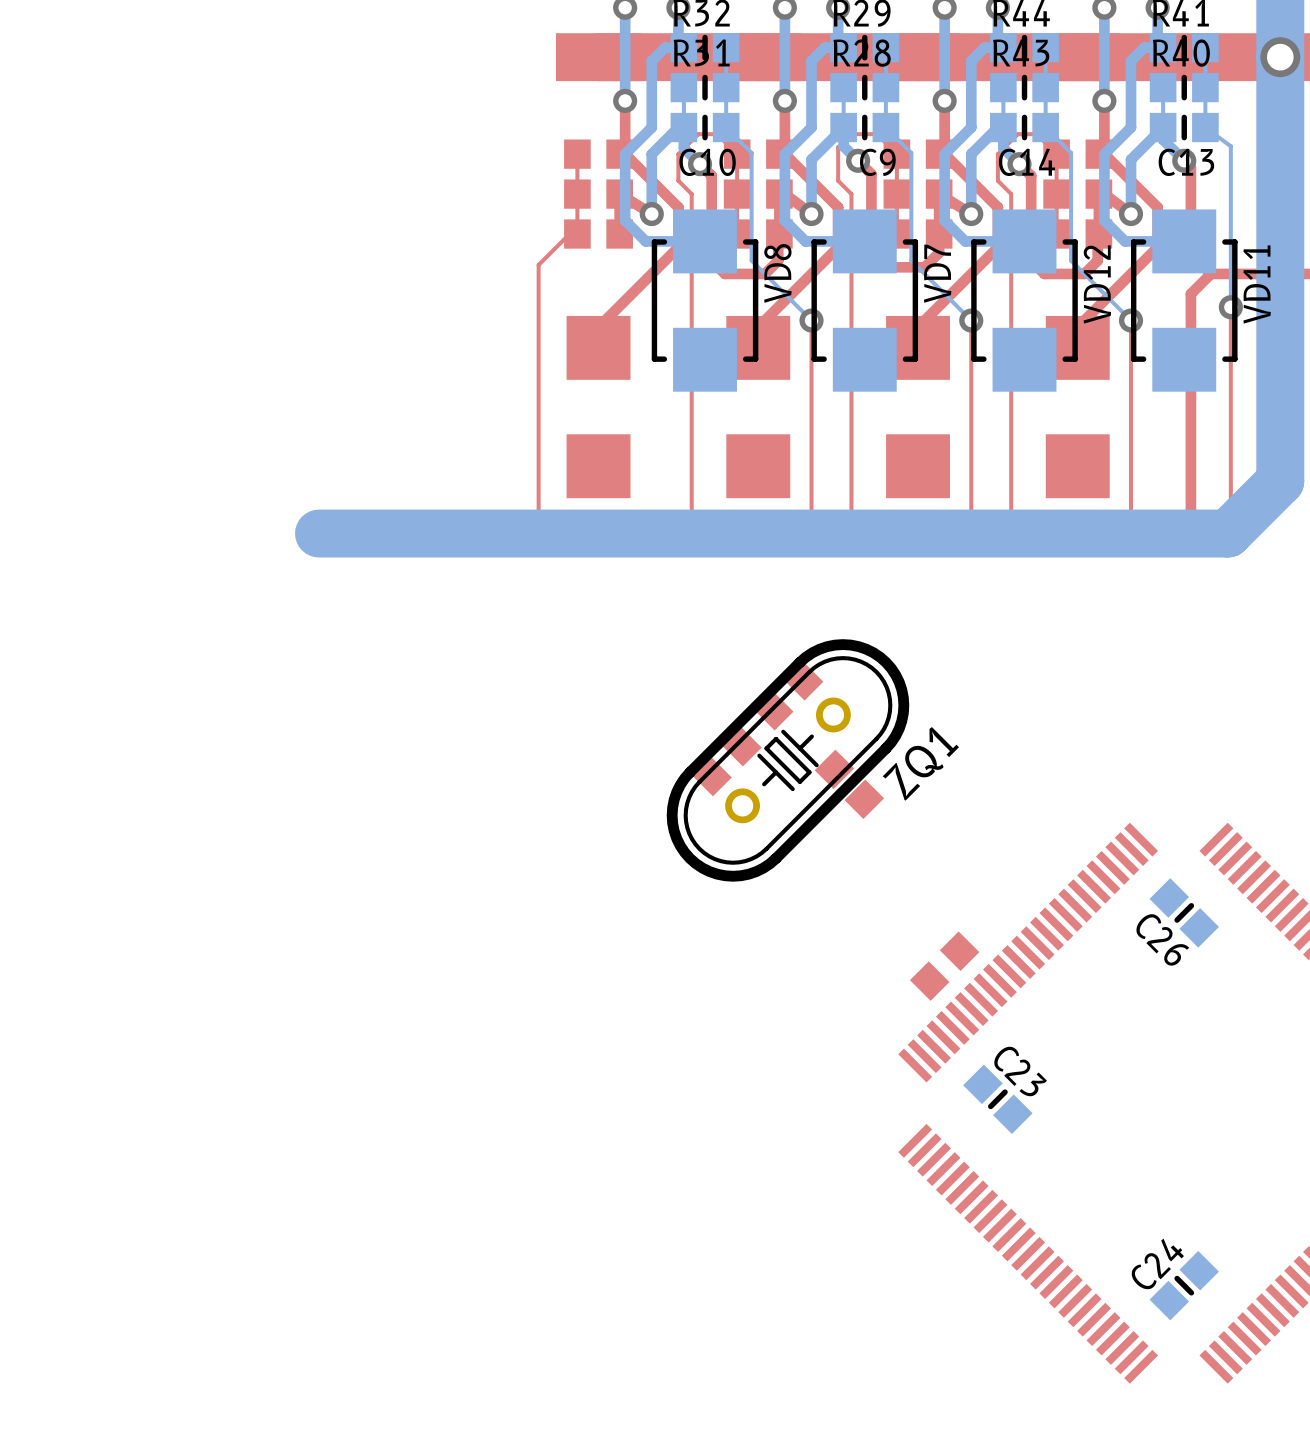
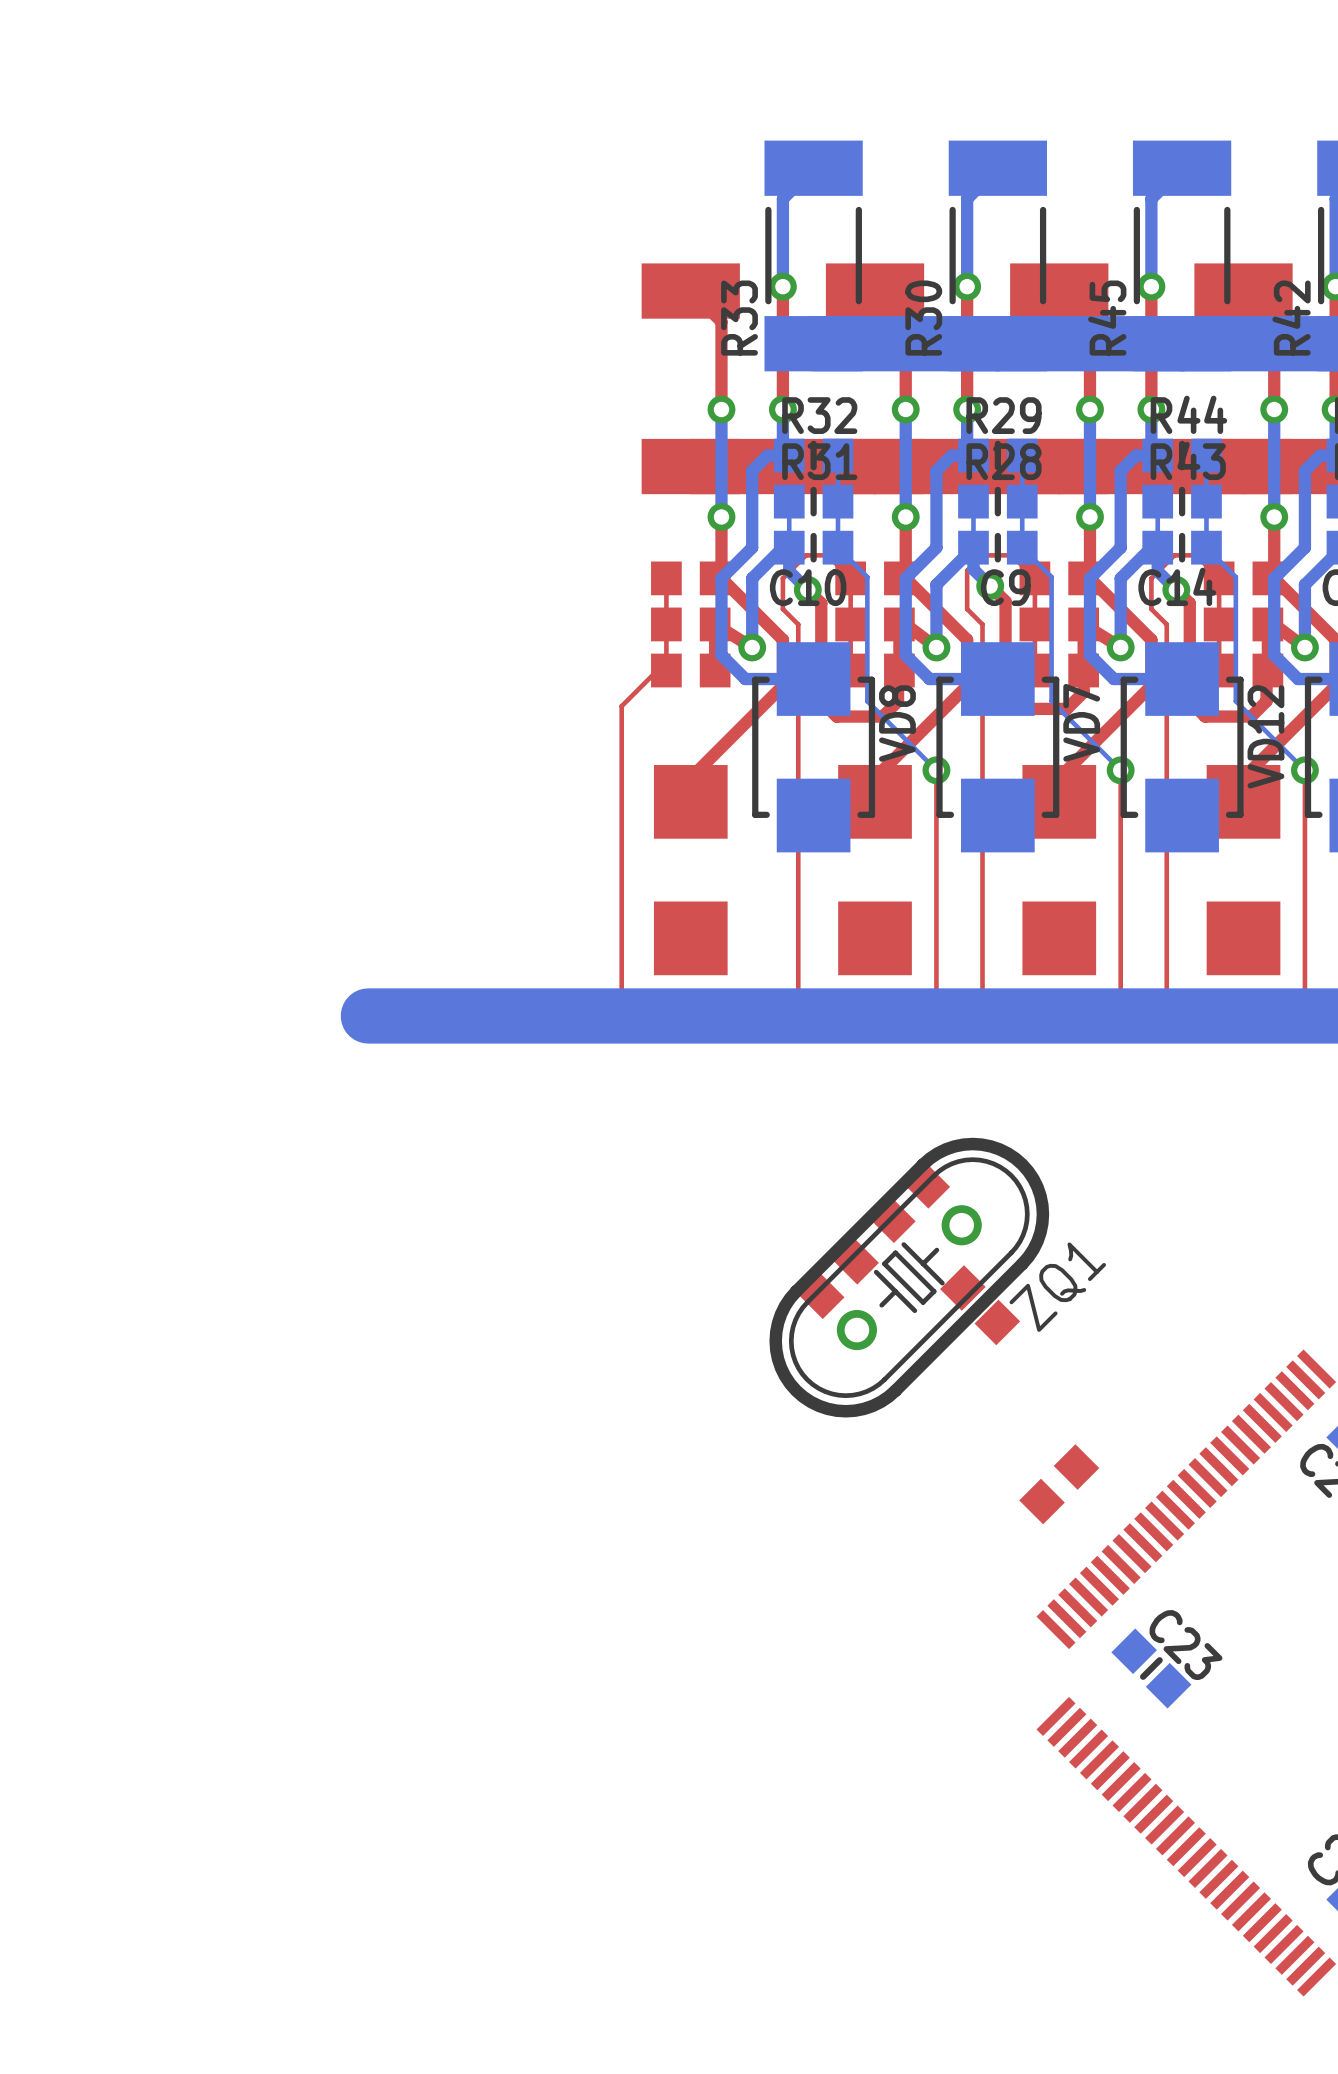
part position: (944, 966) -> (1059, 1484)

